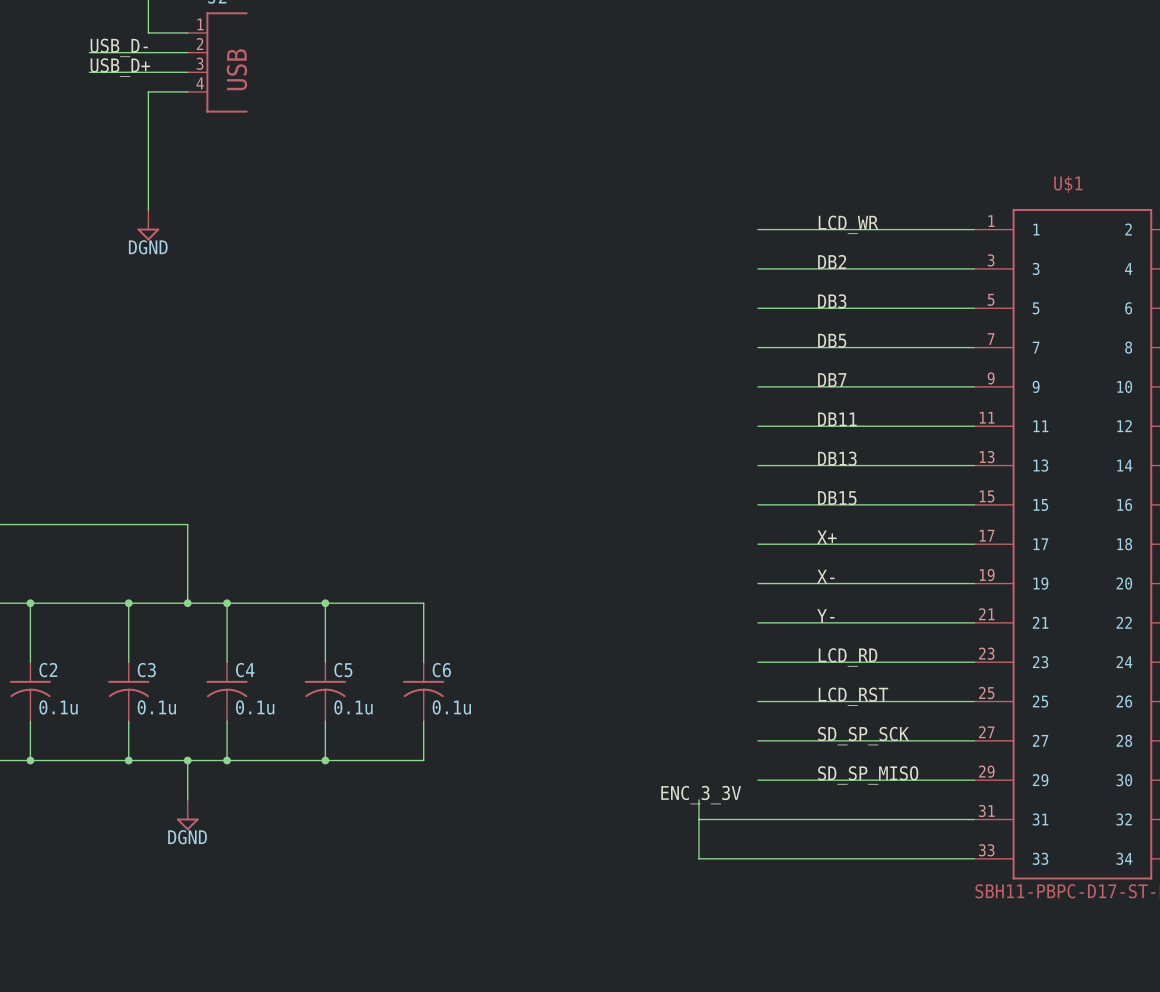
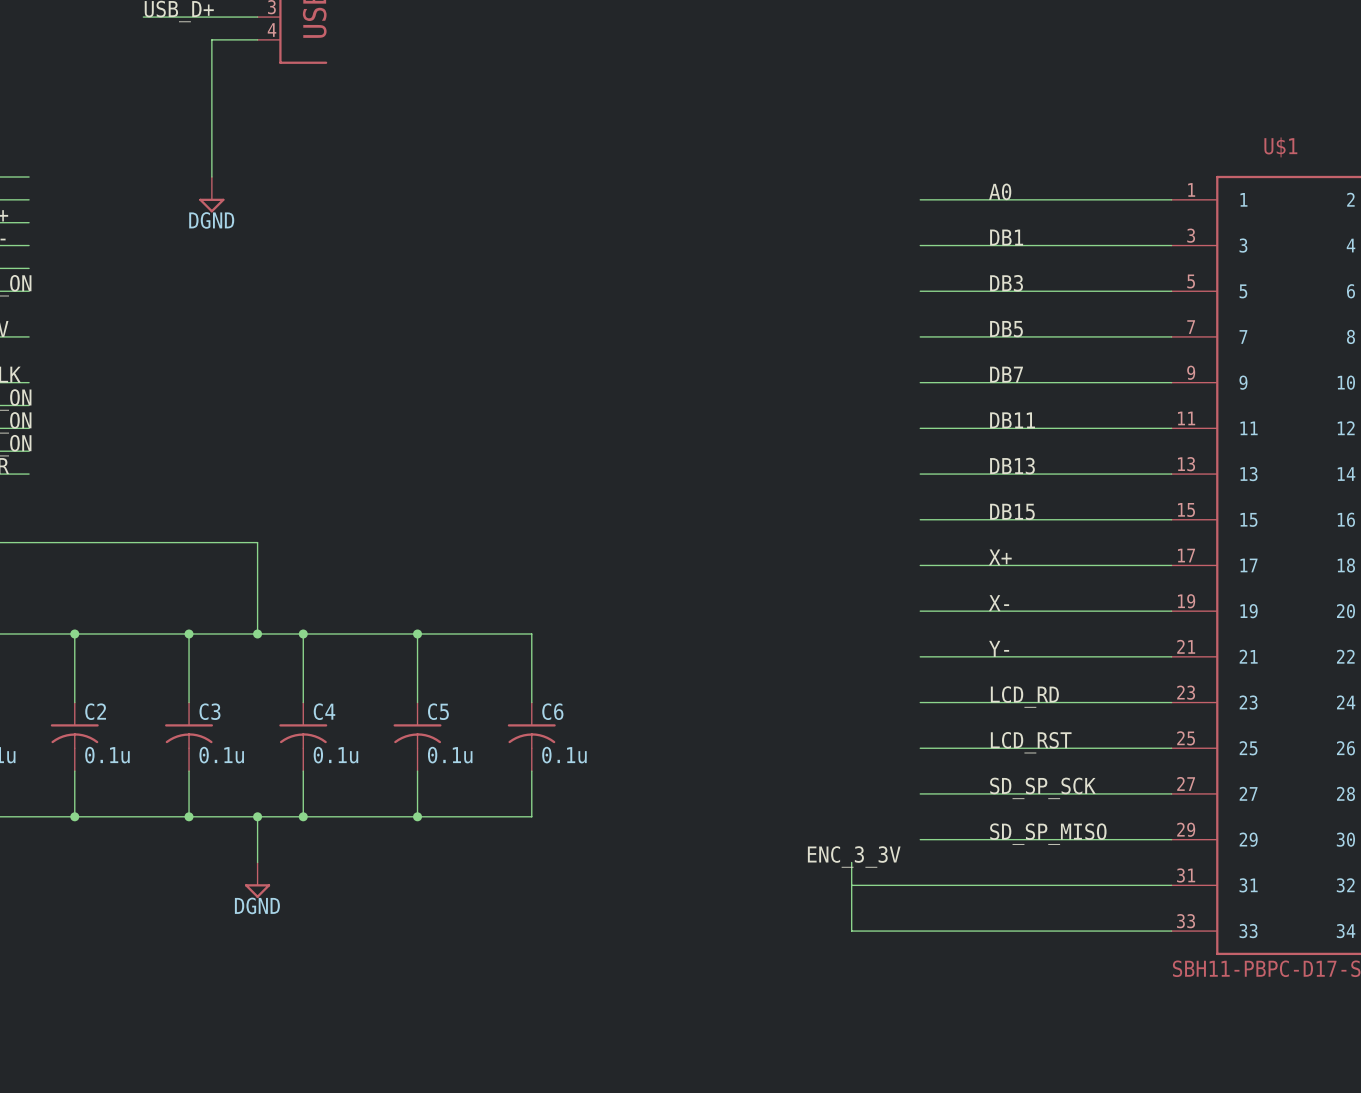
label: LCD_WR (848, 224) -> A0 (1000, 191)
label: DB2 (832, 261) -> DB1 (1006, 237)

